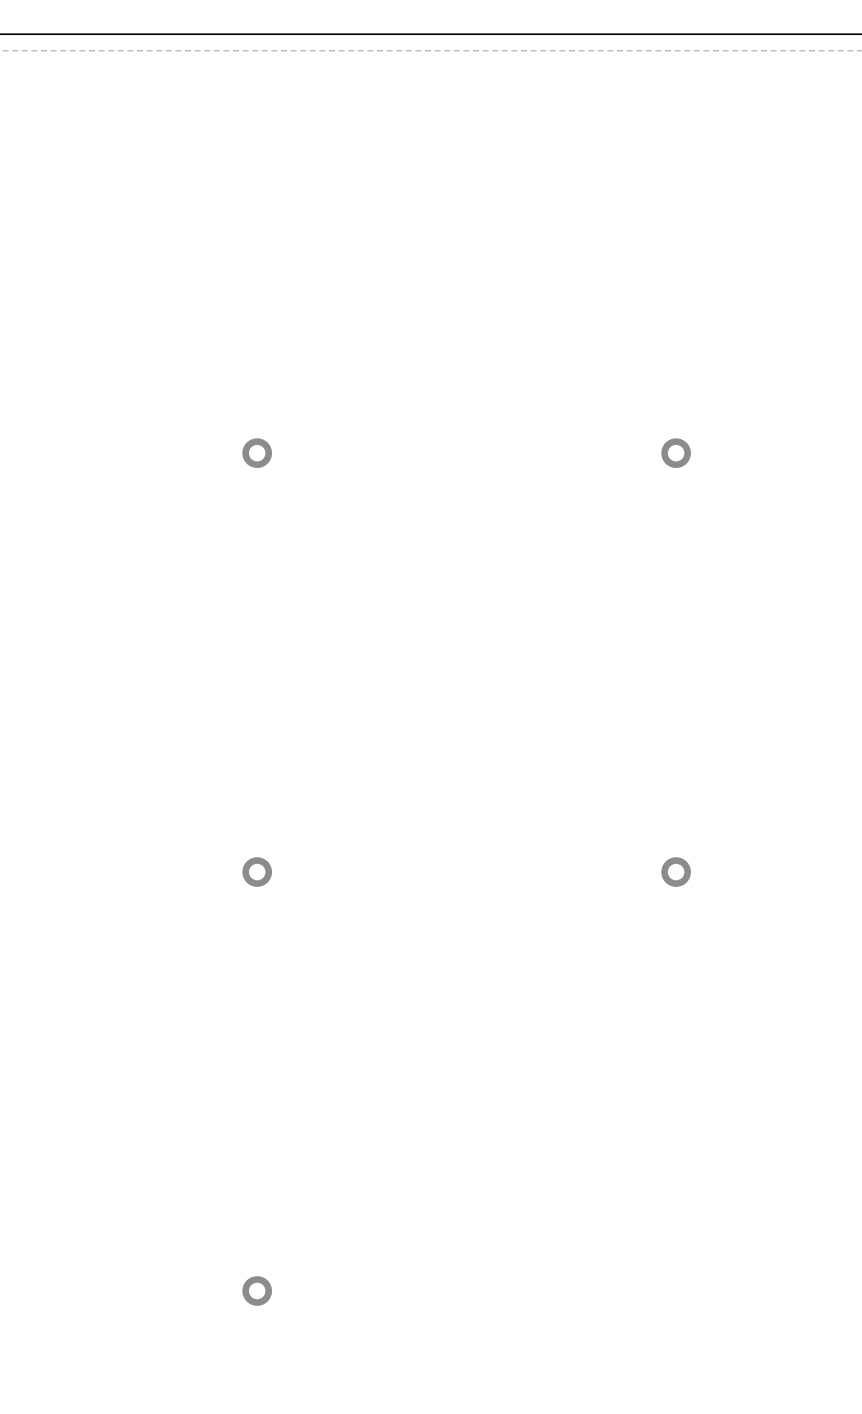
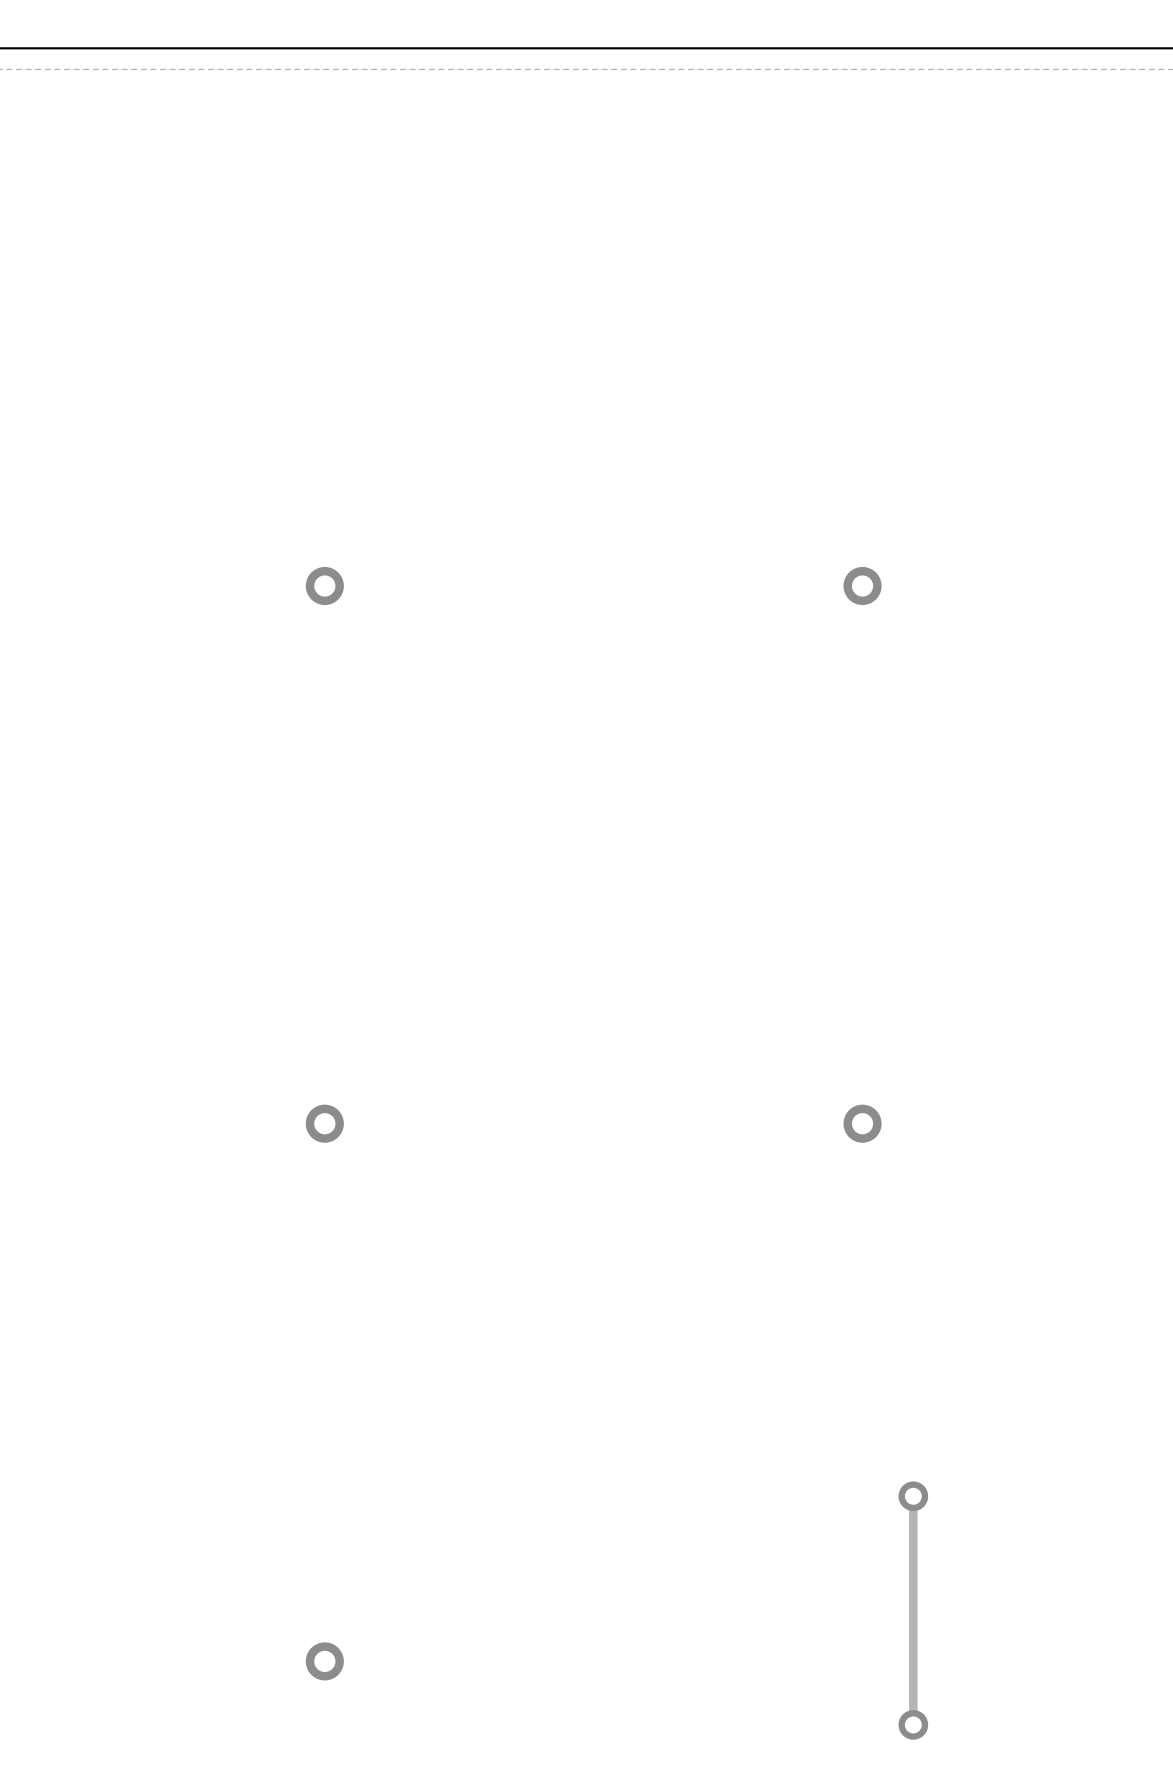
track: none -> (913, 1496) (913, 1724)
via: none -> (913, 1496)
via: none -> (913, 1724)

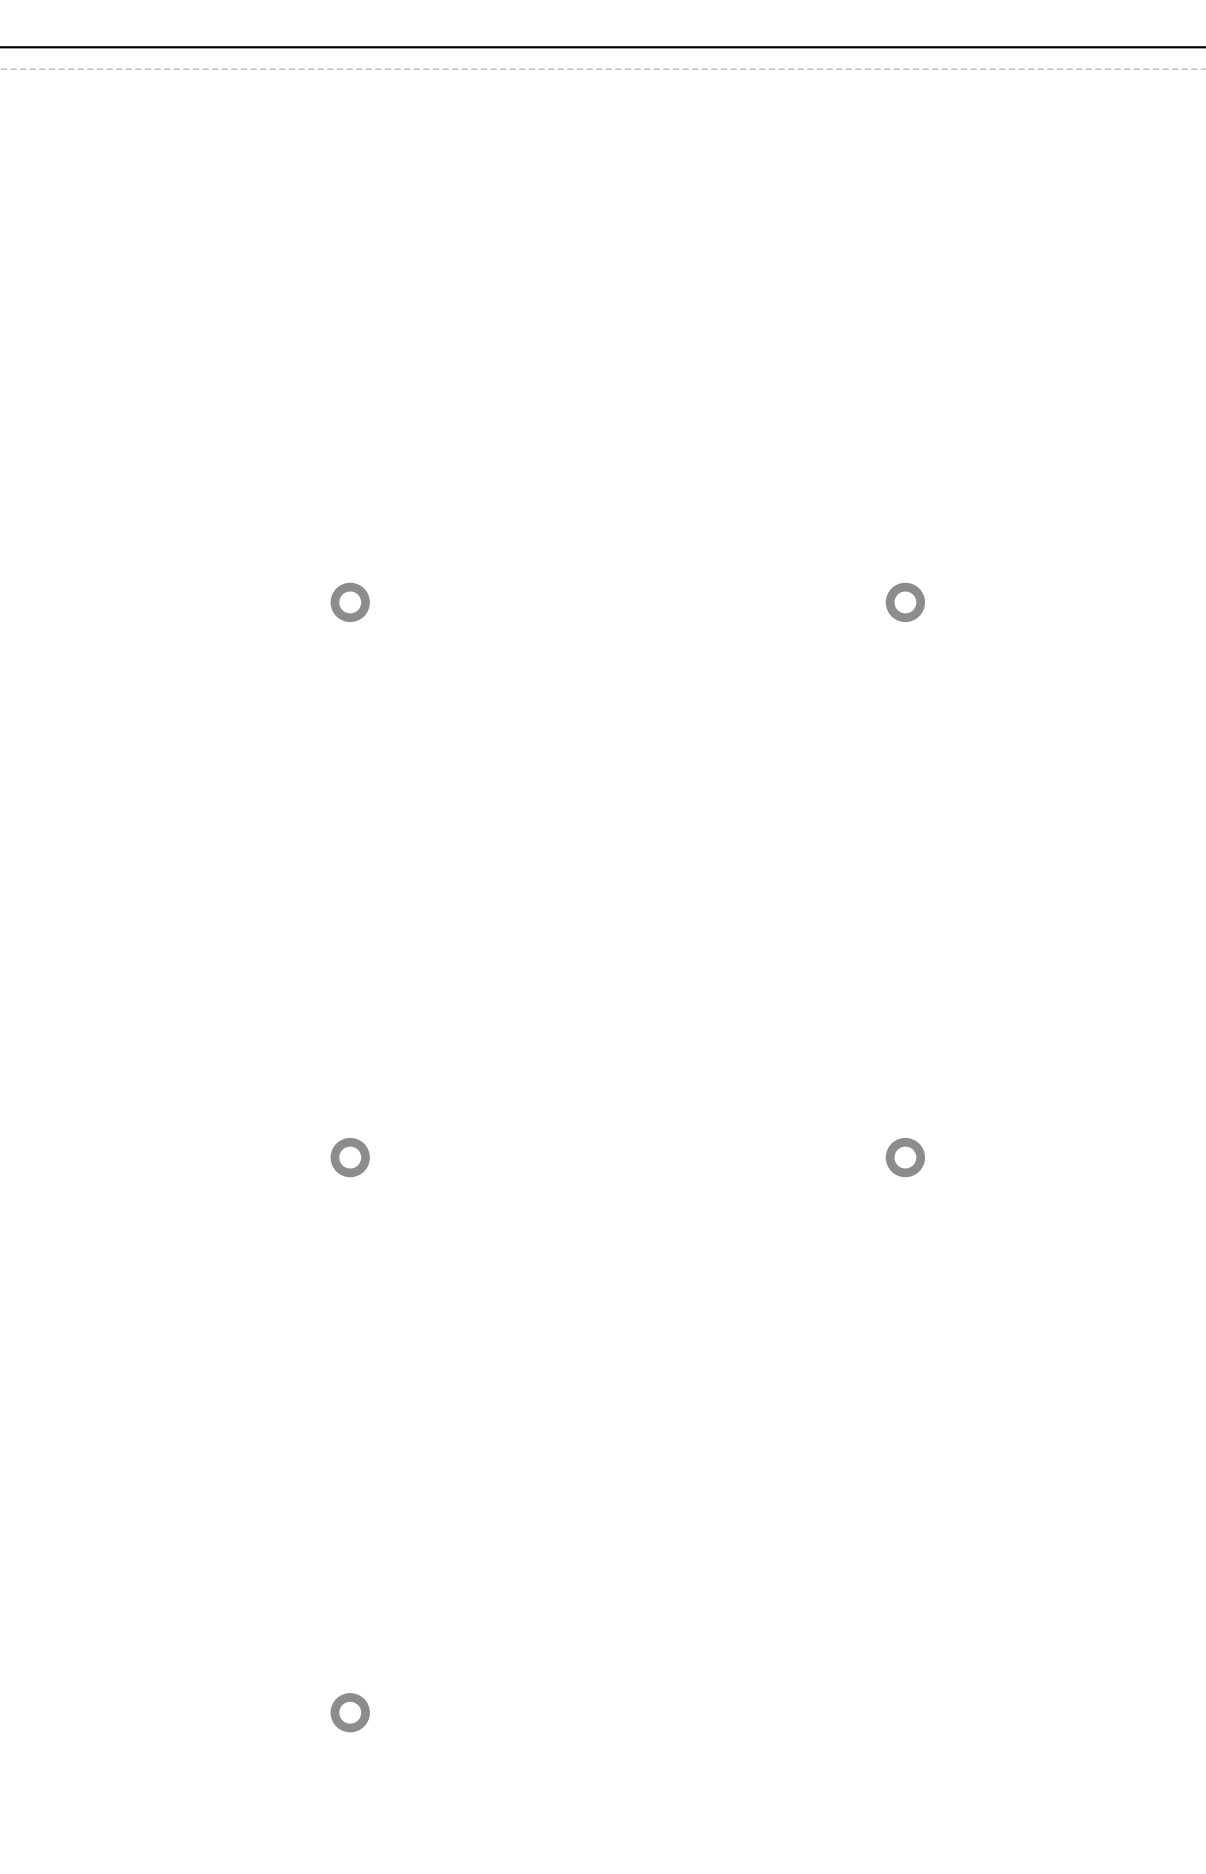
track: (913, 1496) (913, 1724) -> none
via: (913, 1496) -> none
via: (913, 1724) -> none

